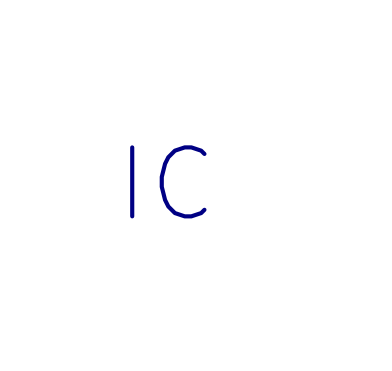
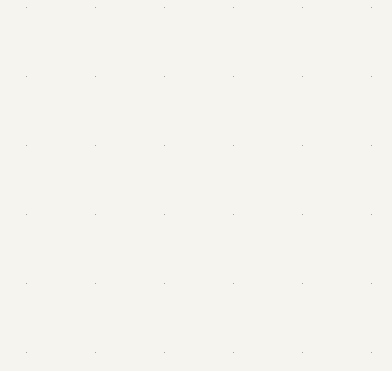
text: IC (168, 181) -> none

